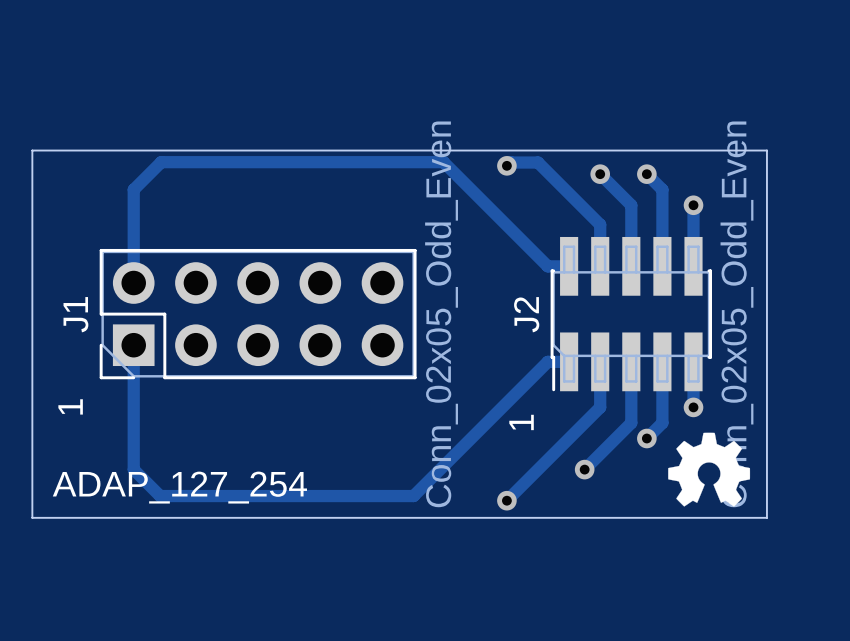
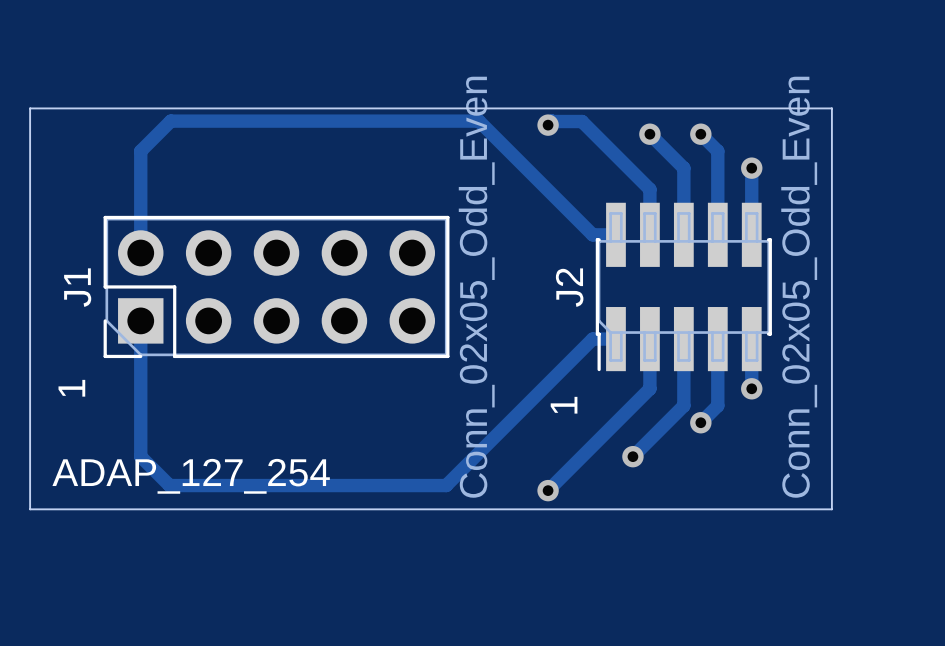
drawing: [668, 432, 751, 507] -> none

